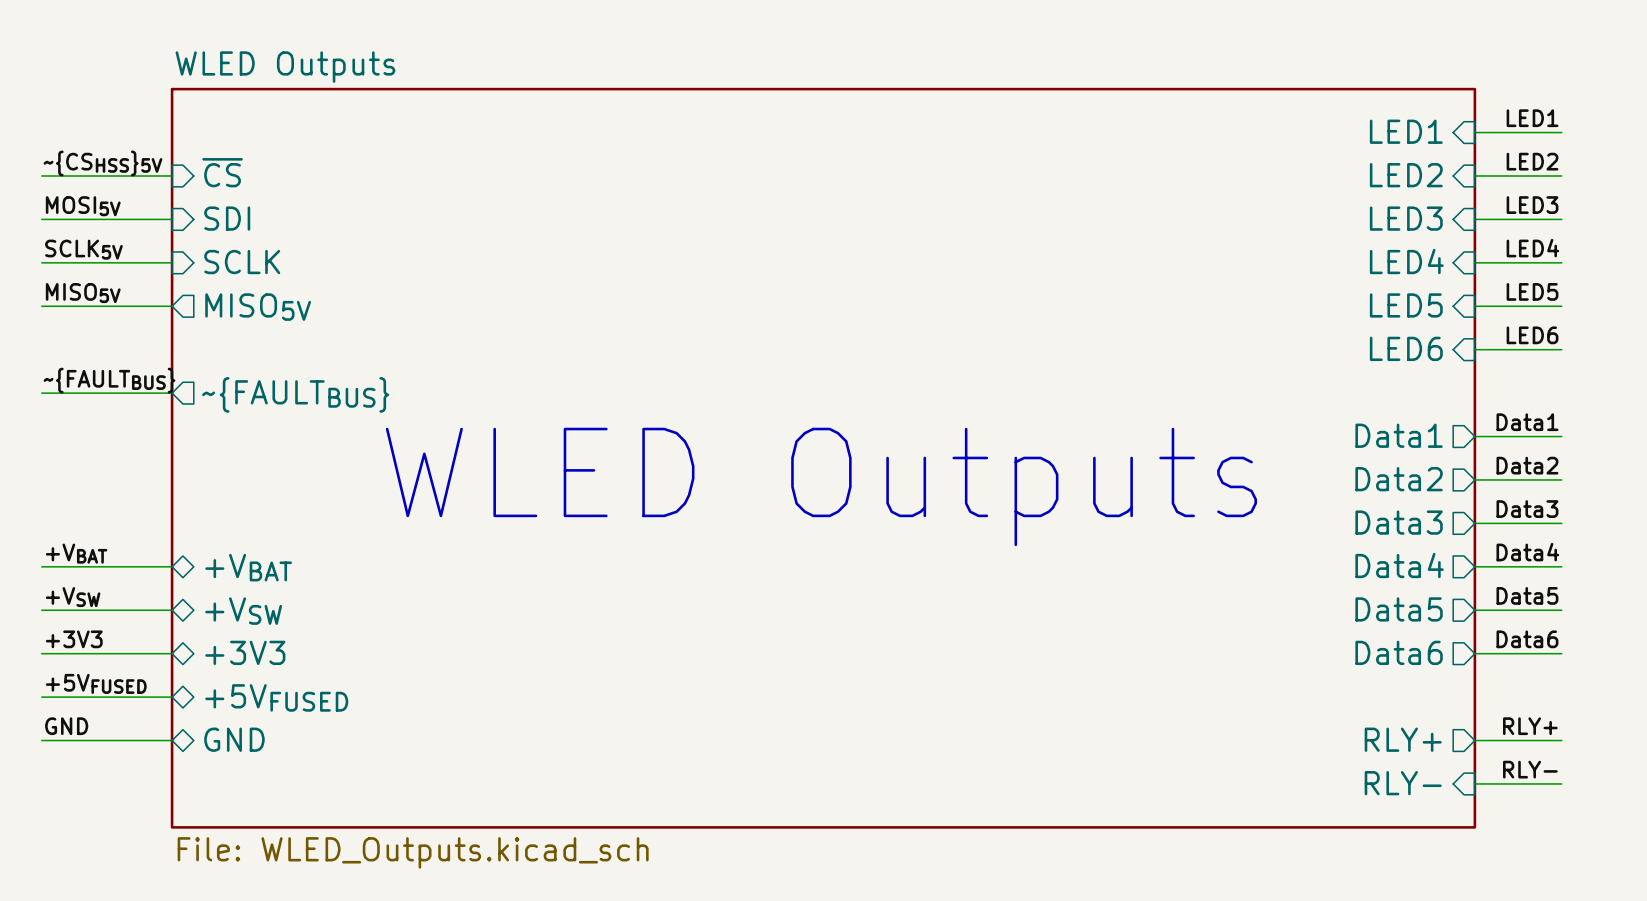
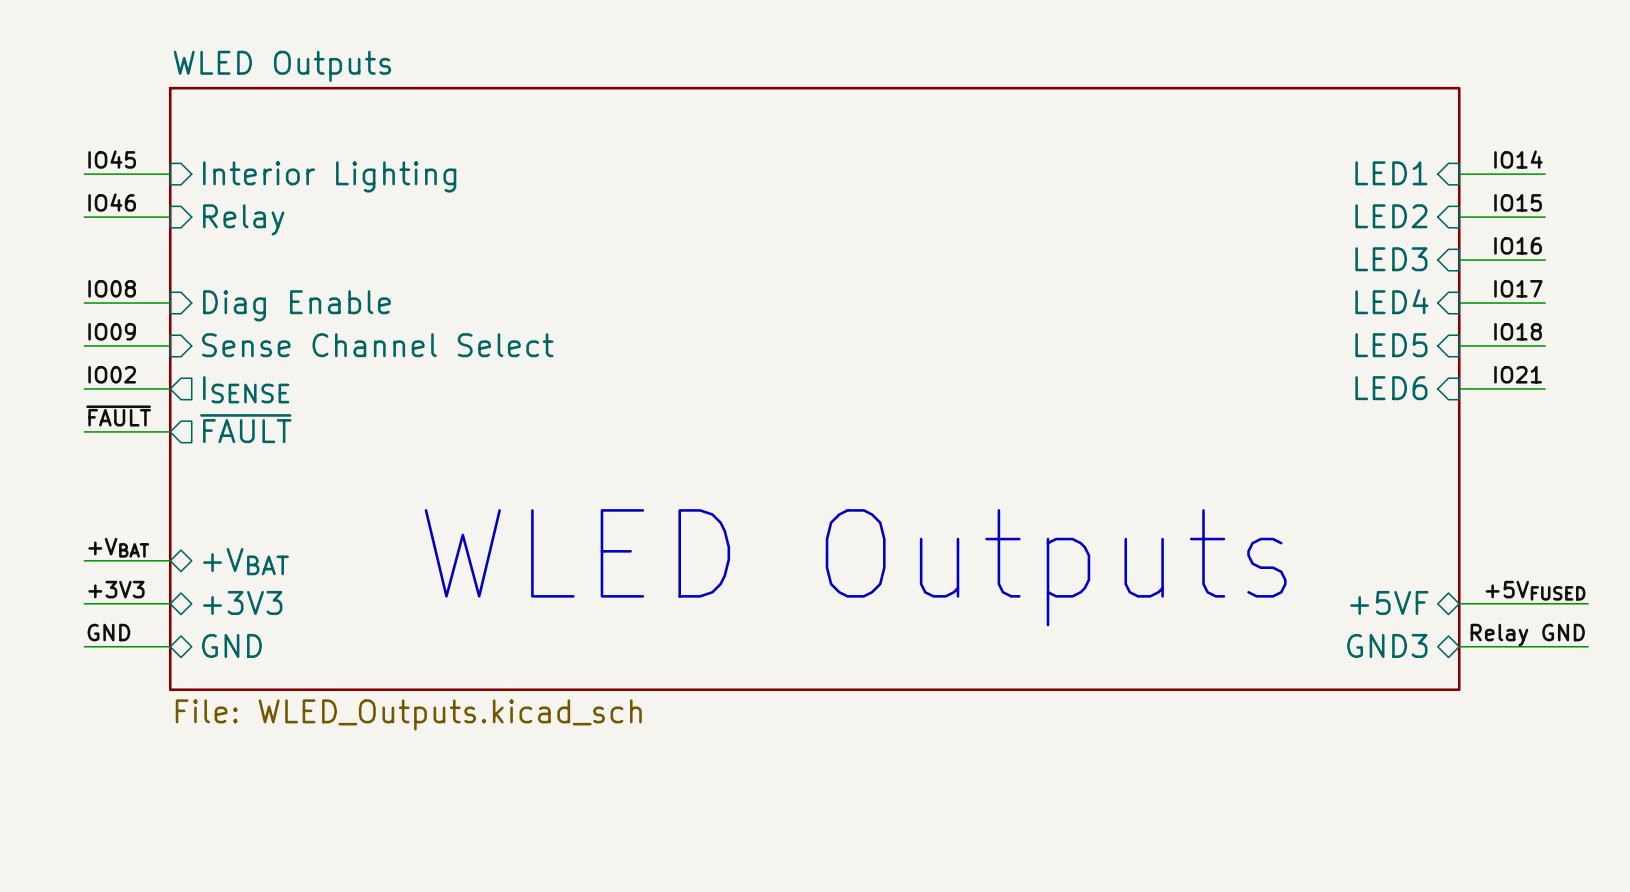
label: LED1 (1532, 118) -> none
sheet pin: LED1 (1406, 131) -> none
wire: (1474, 132) (1561, 132) -> none
label: none -> IO45 (112, 159)
label: LED2 (1532, 161) -> IO14 (1518, 159)
label: ~{CSHSS}5V (103, 163) -> none
sheet pin: ~{CS} (222, 172) -> Interior Lighting (329, 176)
wire: (41, 175) (85, 175) -> none
sheet pin: LED2 (1406, 175) -> LED1 (1391, 173)
label: none -> IO46 (112, 202)
label: LED3 (1532, 205) -> IO15 (1518, 202)
label: MOSI5V (83, 206) -> none
sheet pin: SDI (227, 218) -> Relay (243, 219)
sheet pin: LED3 (1406, 218) -> LED2 (1391, 216)
wire: (41, 219) (85, 219) -> none
label: LED4 (1532, 248) -> IO16 (1518, 245)
label: SCLK5V (83, 249) -> none
sheet pin: LED4 (1406, 261) -> LED3 (1391, 259)
wire: (41, 262) (172, 262) -> none
sheet pin: SCLK (242, 262) -> none
label: none -> IO08 (112, 288)
label: LED5 (1532, 291) -> IO17 (1518, 288)
label: MISO5V (83, 293) -> none
sheet pin: LED5 (1406, 305) -> LED4 (1391, 301)
wire: (41, 306) (85, 306) -> none
sheet pin shape: output (258, 307) -> input (296, 305)
sheet pin: MISO5V (258, 307) -> Diag Enable (296, 305)
label: none -> IO09 (112, 331)
label: LED6 (1532, 335) -> IO18 (1518, 331)
sheet pin: none -> Sense Channel Select (377, 345)
sheet pin: LED6 (1406, 348) -> LED5 (1391, 345)
wire: none -> (84, 345) (170, 345)
label: none -> IO02 (112, 374)
label: none -> IO21 (1518, 374)
label: ~{FAULTBUS} (109, 380) -> none
sheet pin: none -> LED6 (1391, 388)
wire: (41, 393) (85, 393) -> none
sheet WLED Outputs: none -> File: WLED_Outputs.kicad_sch (814, 388)
sheet pin: ~{FAULTBUS} (295, 394) -> ISENSE (246, 389)
label: none -> ~{FAULT} (118, 416)
label: Data1 (1527, 422) -> none
sheet pin: none -> ~{FAULT} (245, 428)
sheet pin: Data1 (1399, 435) -> none
wire: none -> (84, 431) (170, 431)
wire: (1474, 436) (1561, 436) -> (1459, 388) (1545, 388)
sheet WLED Outputs: File: WLED_Outputs.kicad_sch (823, 458) -> none
label: Data2 (1527, 465) -> none
sheet pin: Data2 (1399, 479) -> none
wire: (1474, 479) (1561, 479) -> none
text position: WLED Outputs (821, 486) -> WLED Outputs (855, 567)
label: Data3 (1527, 509) -> none
sheet pin: Data3 (1399, 522) -> none
wire: (1474, 523) (1561, 523) -> none
label: Data4 (1527, 552) -> none
label position: +VBAT (76, 553) -> +VBAT (118, 547)
sheet pin: Data4 (1399, 565) -> none
wire: (41, 566) (85, 566) -> none
wire: (1474, 566) (1561, 566) -> none
label: Data5 (1527, 595) -> none
label: +VSW (73, 597) -> none
label: none -> +5VFUSED (1535, 590)
sheet pin shape: output (1399, 609) -> bidirectional (1389, 602)
sheet pin: Data5 (1399, 609) -> +5VF (1389, 602)
wire: (41, 610) (85, 610) -> none
wire: none -> (1545, 603) (1588, 603)
sheet pin: +VSW (243, 611) -> +3V3 (242, 602)
label position: +3V3 (74, 639) -> +3V3 (116, 589)
label: Data6 (1527, 639) -> none
label: none -> Relay GND (1527, 635)
sheet pin: +3V3 (245, 652) -> GND (231, 645)
sheet pin shape: output (1399, 652) -> bidirectional (1387, 645)
sheet pin: Data6 (1399, 652) -> GND3 (1387, 645)
wire: (41, 653) (85, 653) -> none
wire: none -> (1545, 646) (1588, 646)
label: +5VFUSED (96, 683) -> none
wire: (41, 697) (172, 697) -> none
sheet pin: +5VFUSED (276, 697) -> none
label position: GND (66, 726) -> GND (108, 632)
label: RLY+ (1530, 726) -> none
sheet pin: GND (234, 739) -> none
sheet pin: RLY+ (1403, 739) -> none
wire: (41, 740) (172, 740) -> none
wire: (1474, 740) (1561, 740) -> none
label: RLY- (1530, 769) -> none
sheet pin: RLY- (1403, 783) -> none
wire: (1474, 783) (1561, 783) -> none

